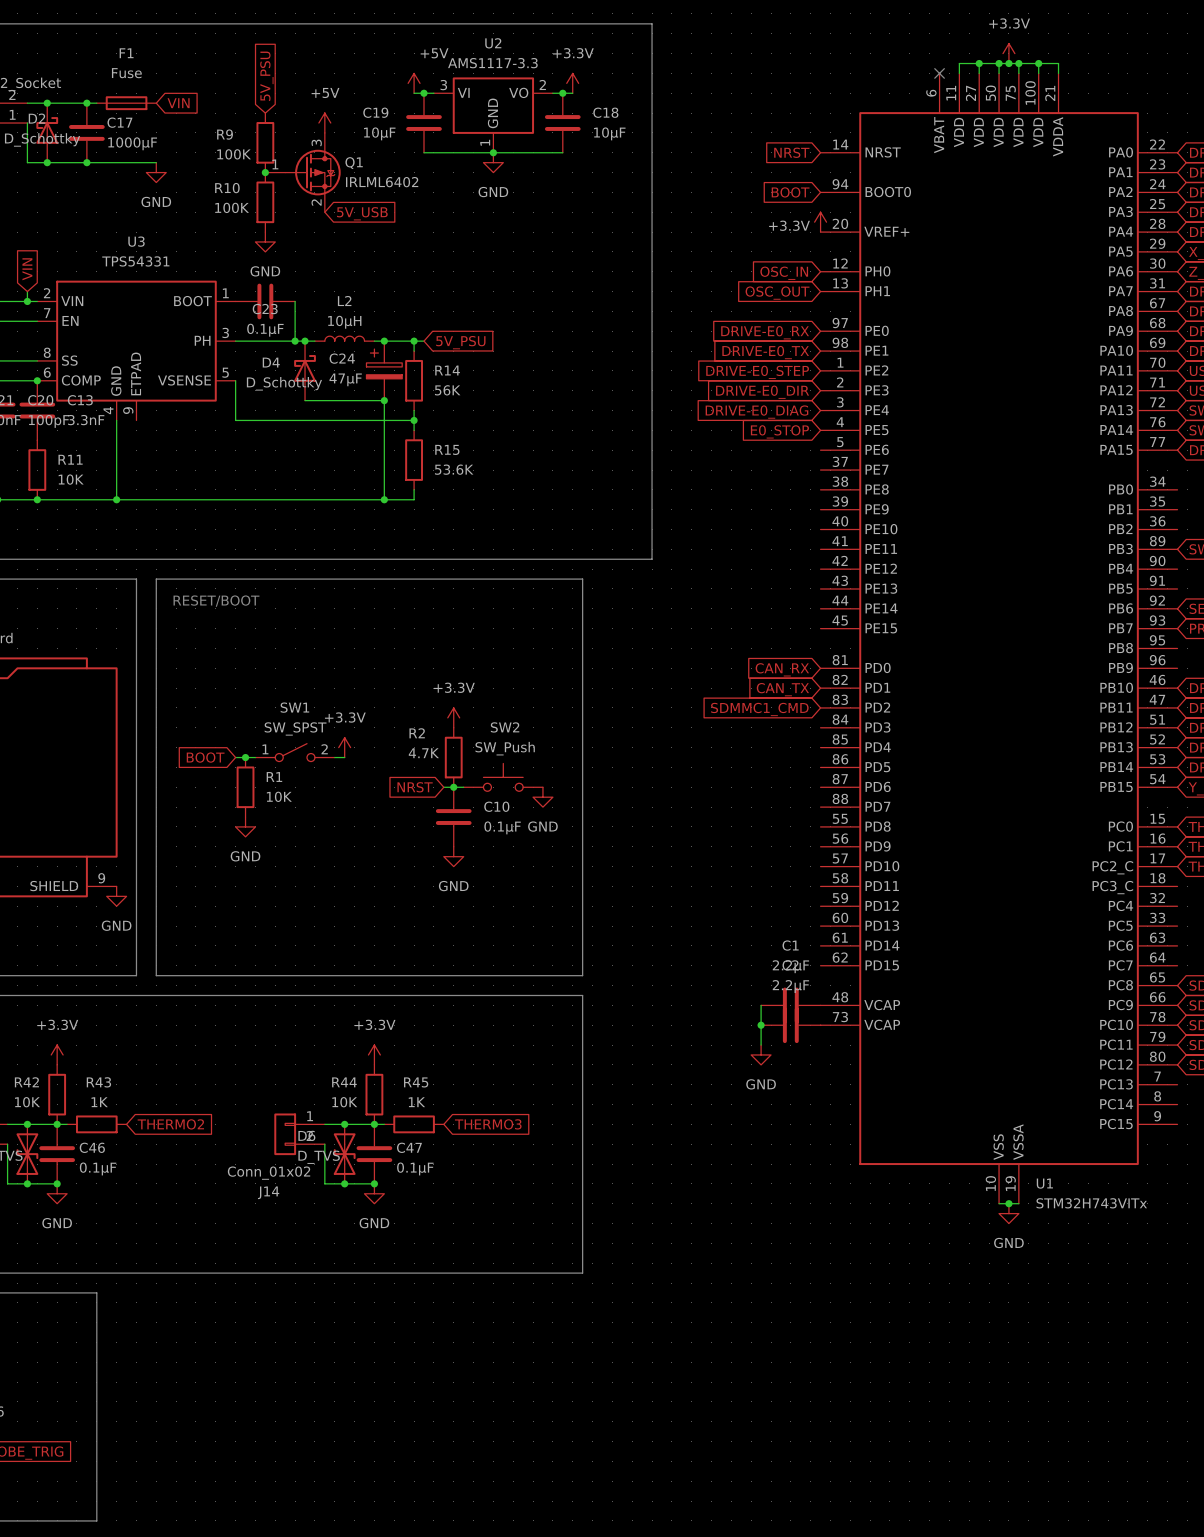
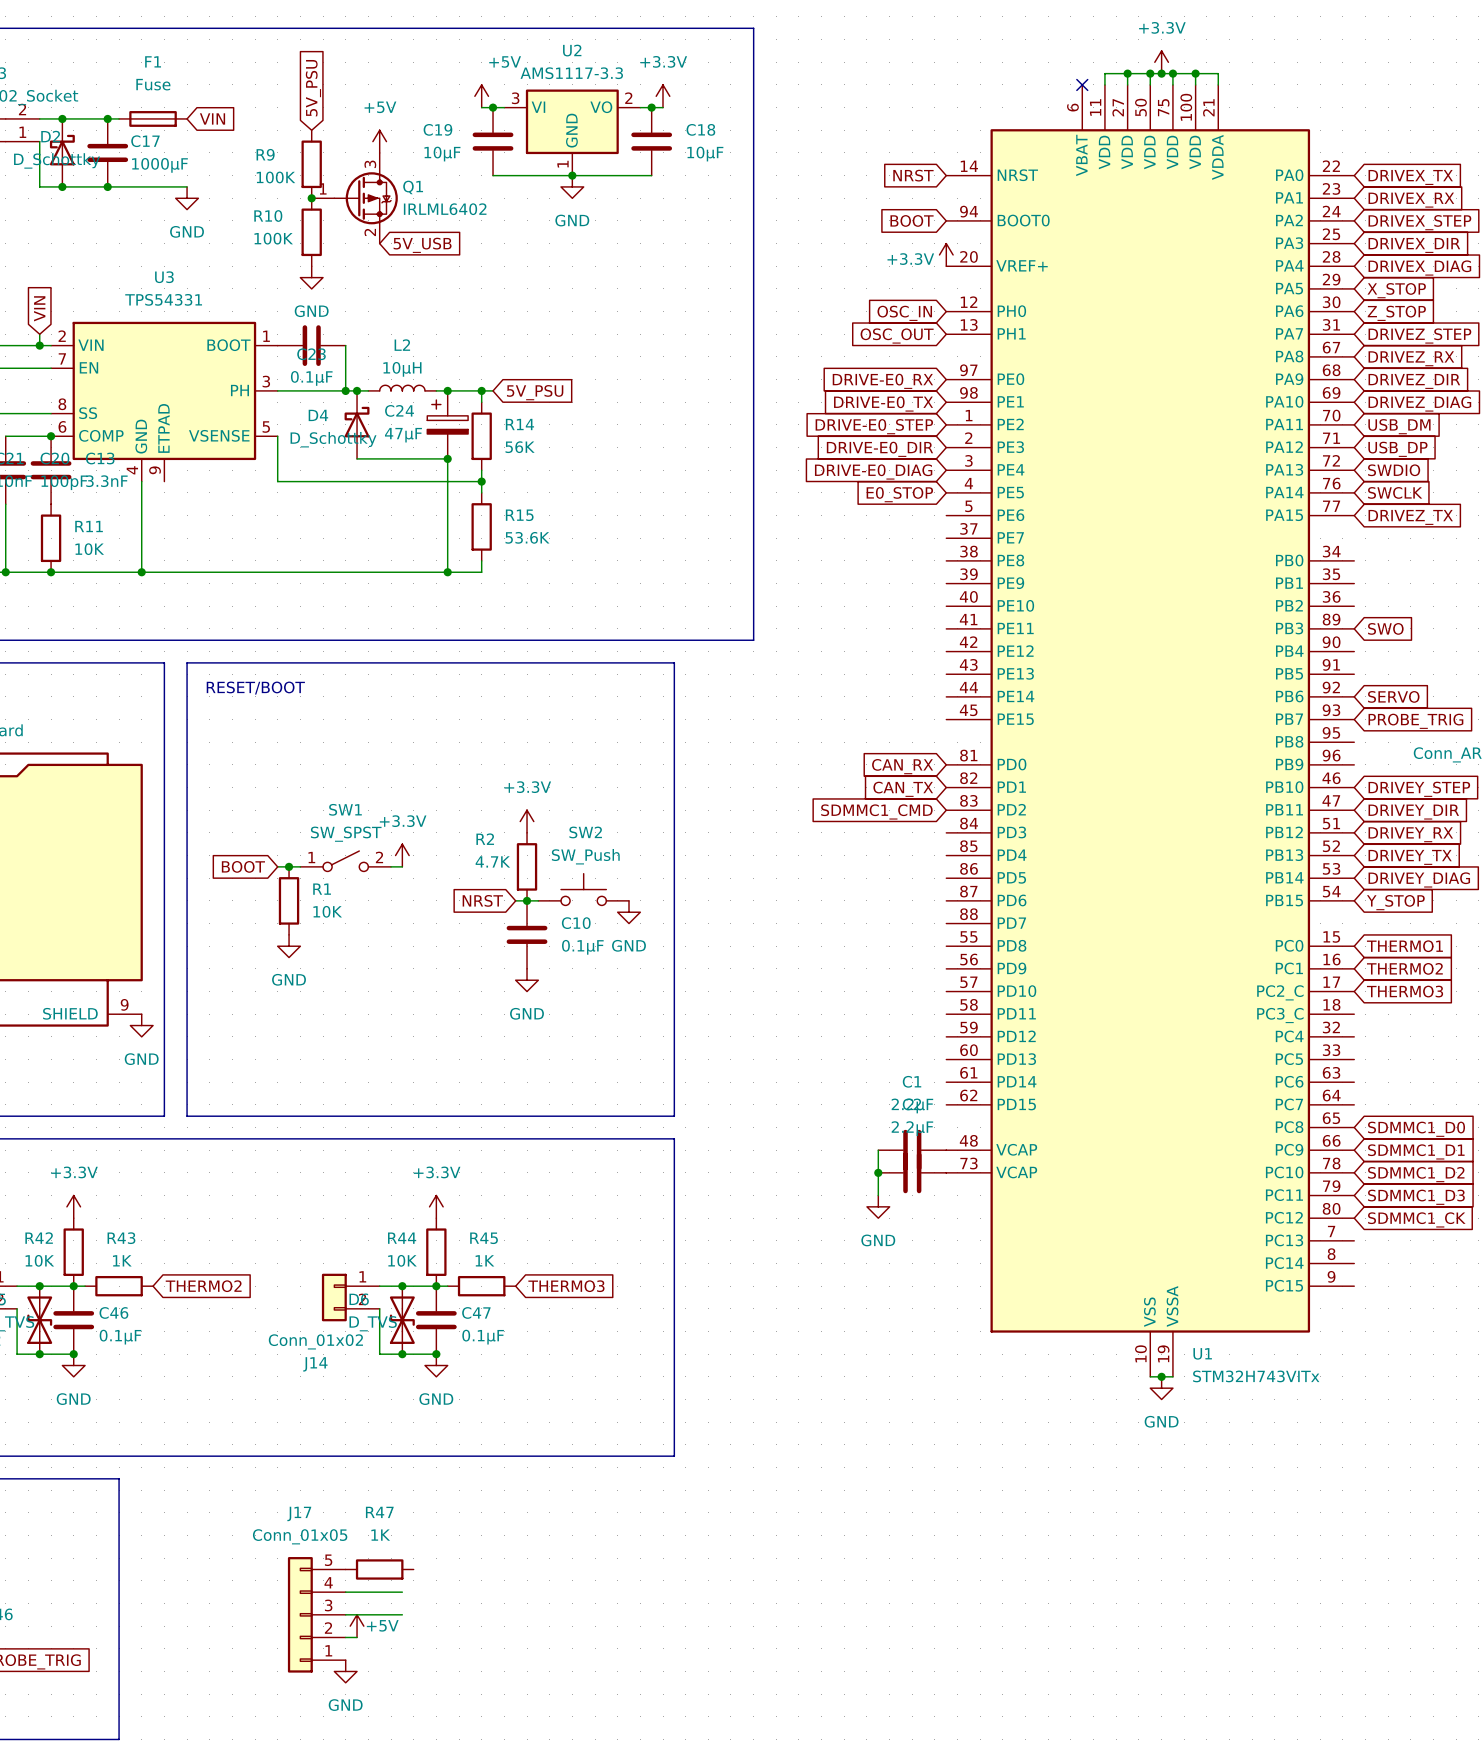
R47: none -> 1K (379, 1569)
wire: none -> (345, 1592) (402, 1592)
J17: none -> Conn_01x05 (316, 1614)
wire: none -> (345, 1614) (402, 1614)
power symbol: none -> +5V (357, 1626)
wire: none -> (345, 1637) (357, 1637)
power symbol: none -> GND (345, 1671)

